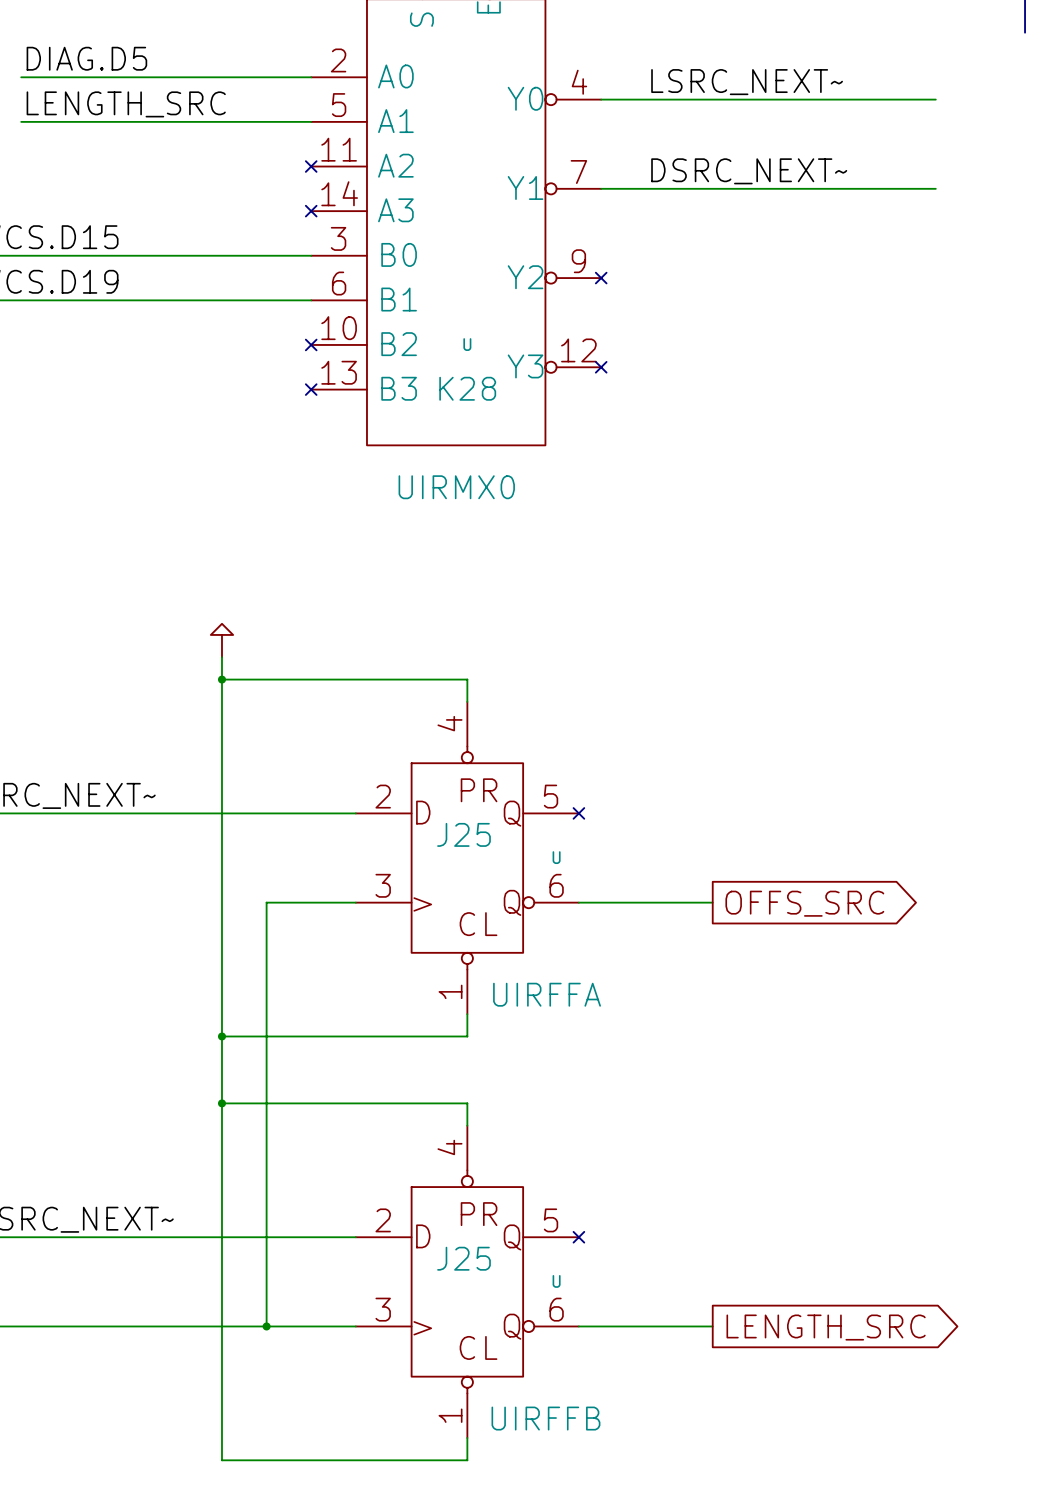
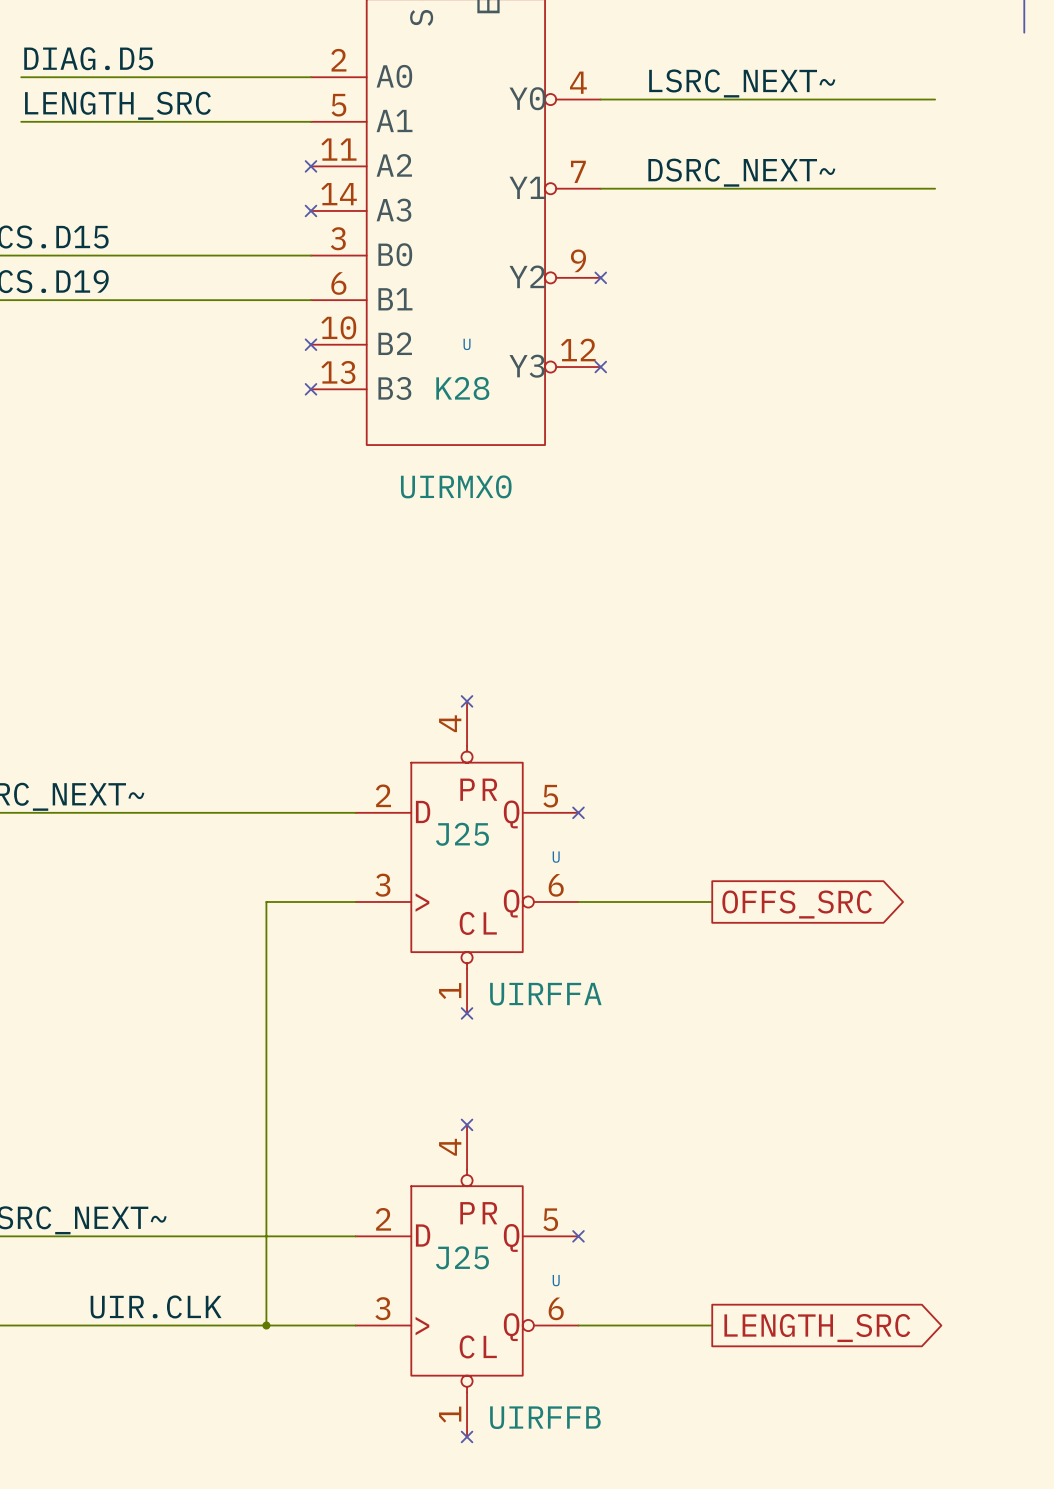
power symbol: (221, 640) -> none
wire: (221, 657) (221, 1460) (467, 1460) (467, 1438) -> none
wire: (221, 679) (467, 679) (467, 701) -> none
junction: (221, 679) -> none
no-connect mark: none -> (467, 701)
wire: (467, 1014) (467, 1036) (221, 1036) -> none
no-connect mark: none -> (467, 1013)
junction: (221, 1036) -> none
wire: (221, 1103) (467, 1103) (467, 1125) -> none
junction: (221, 1103) -> none
no-connect mark: none -> (467, 1124)
label: none -> UIR.CLK (156, 1306)
no-connect mark: none -> (467, 1436)

